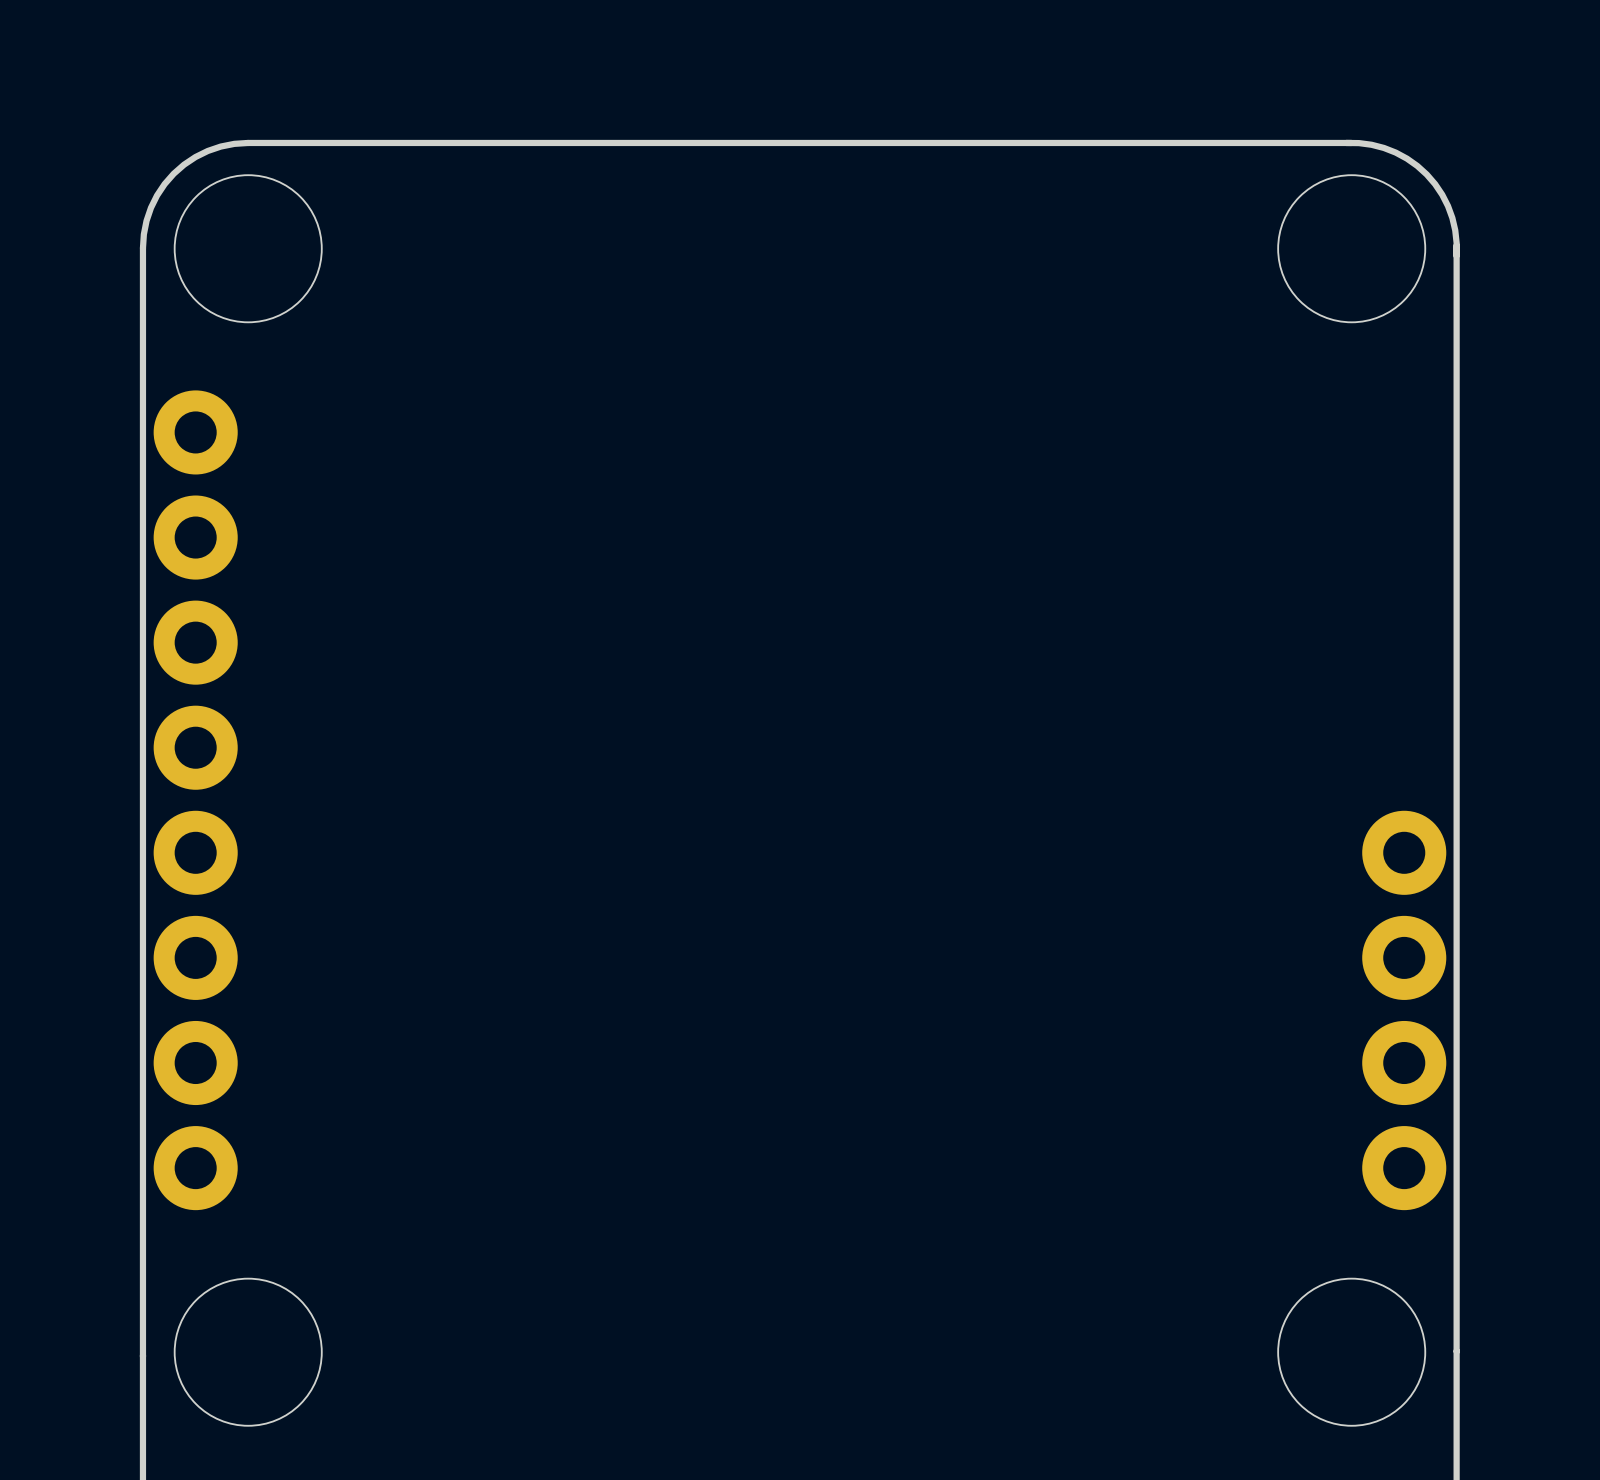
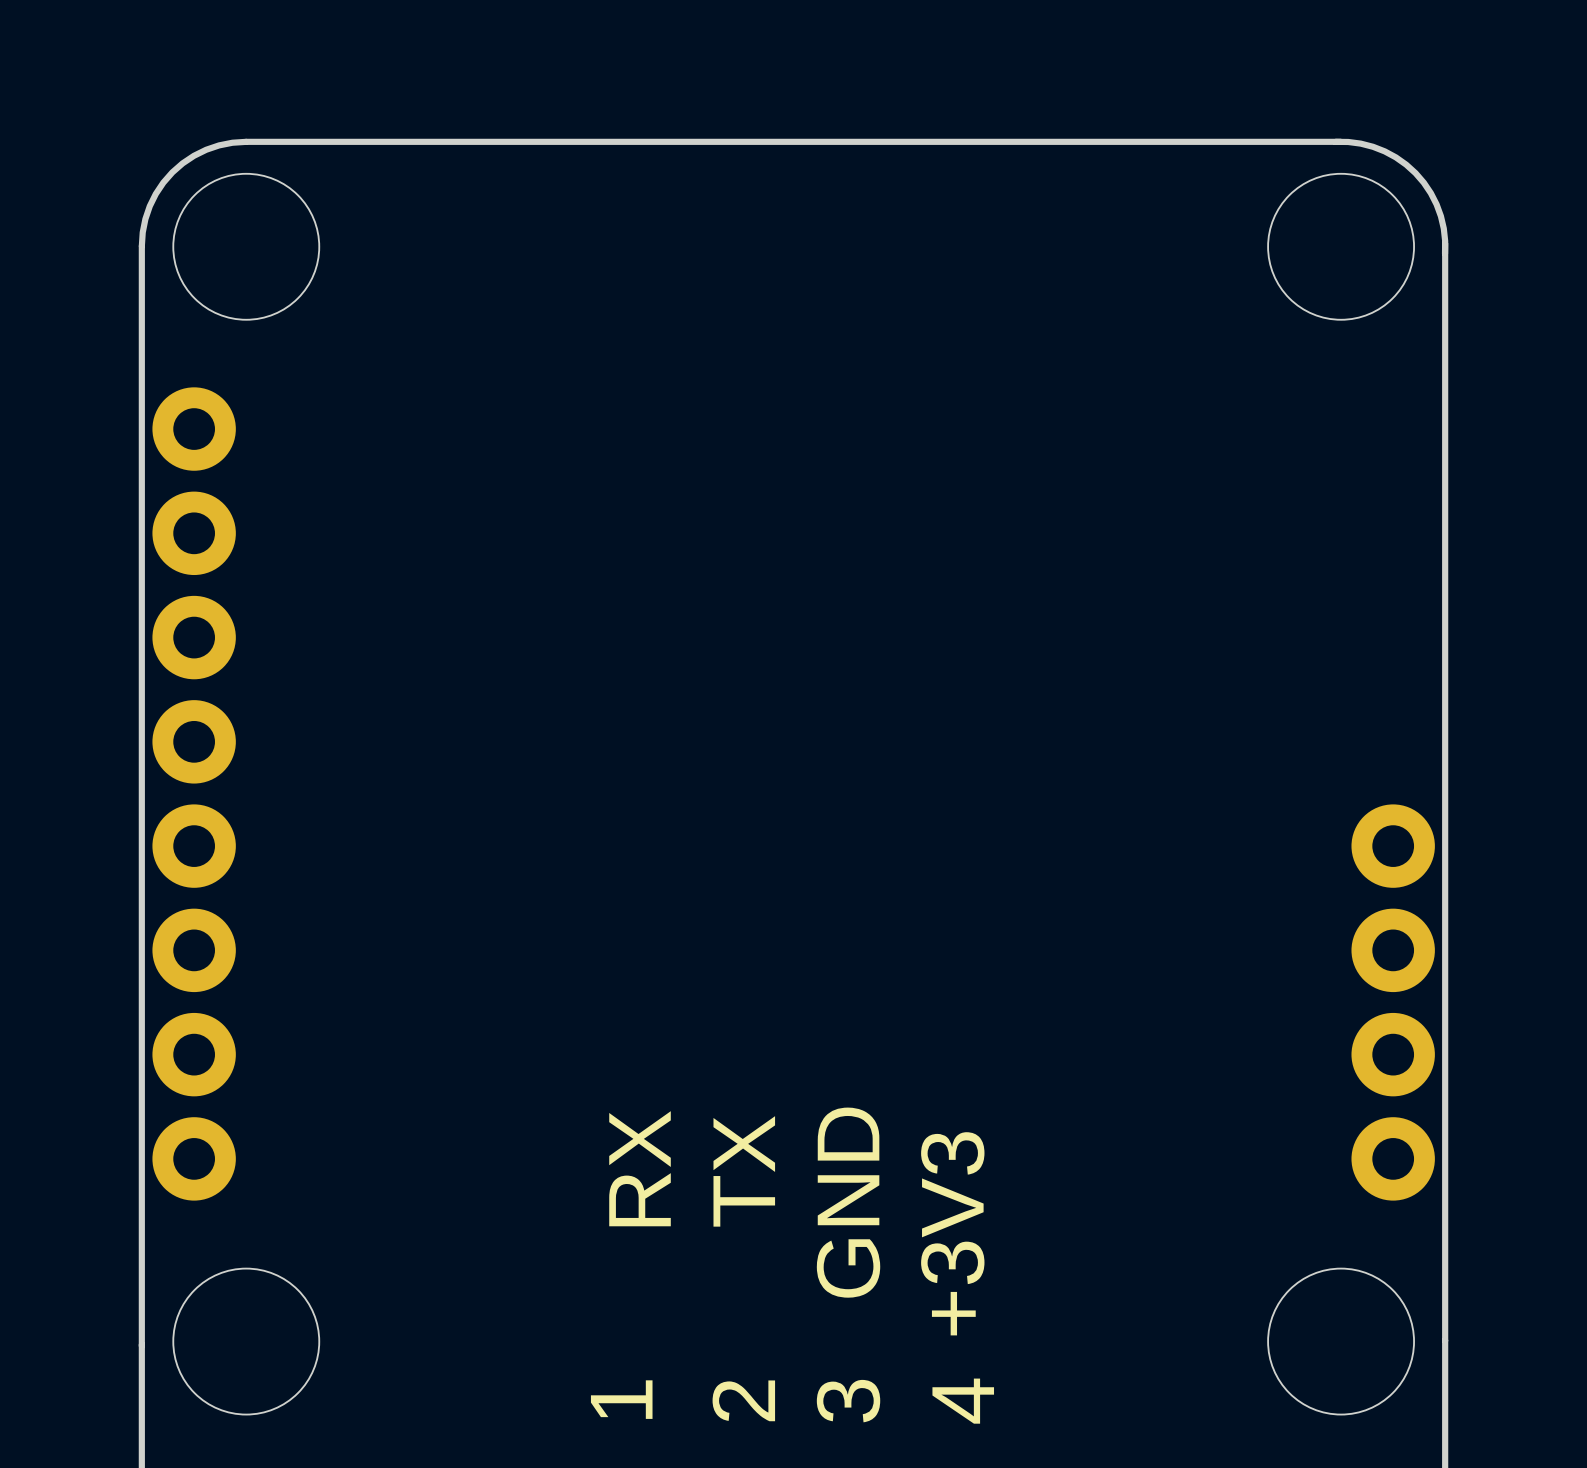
text: none -> RX (640, 1168)
text: none -> TX (744, 1171)
text: none -> GND (848, 1202)
text: none -> +3V3 (952, 1233)
text: none -> 1 (621, 1399)
text: none -> 2 (743, 1400)
text: none -> 3 (848, 1401)
text: none -> 4 (963, 1401)

